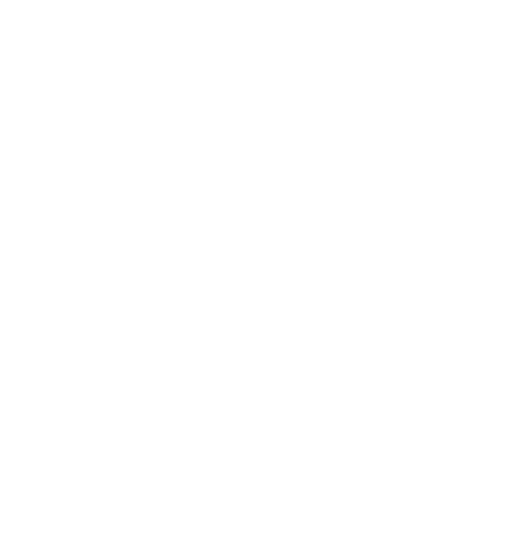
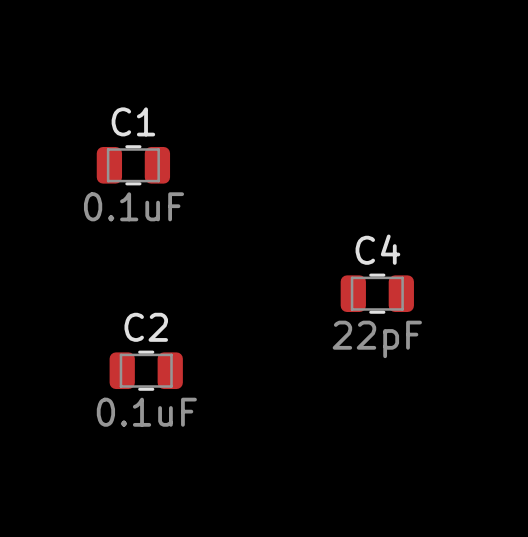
C1: none -> 0.1uF (133, 165)
C4: none -> 22pF (377, 293)
C2: none -> 0.1uF (146, 370)

